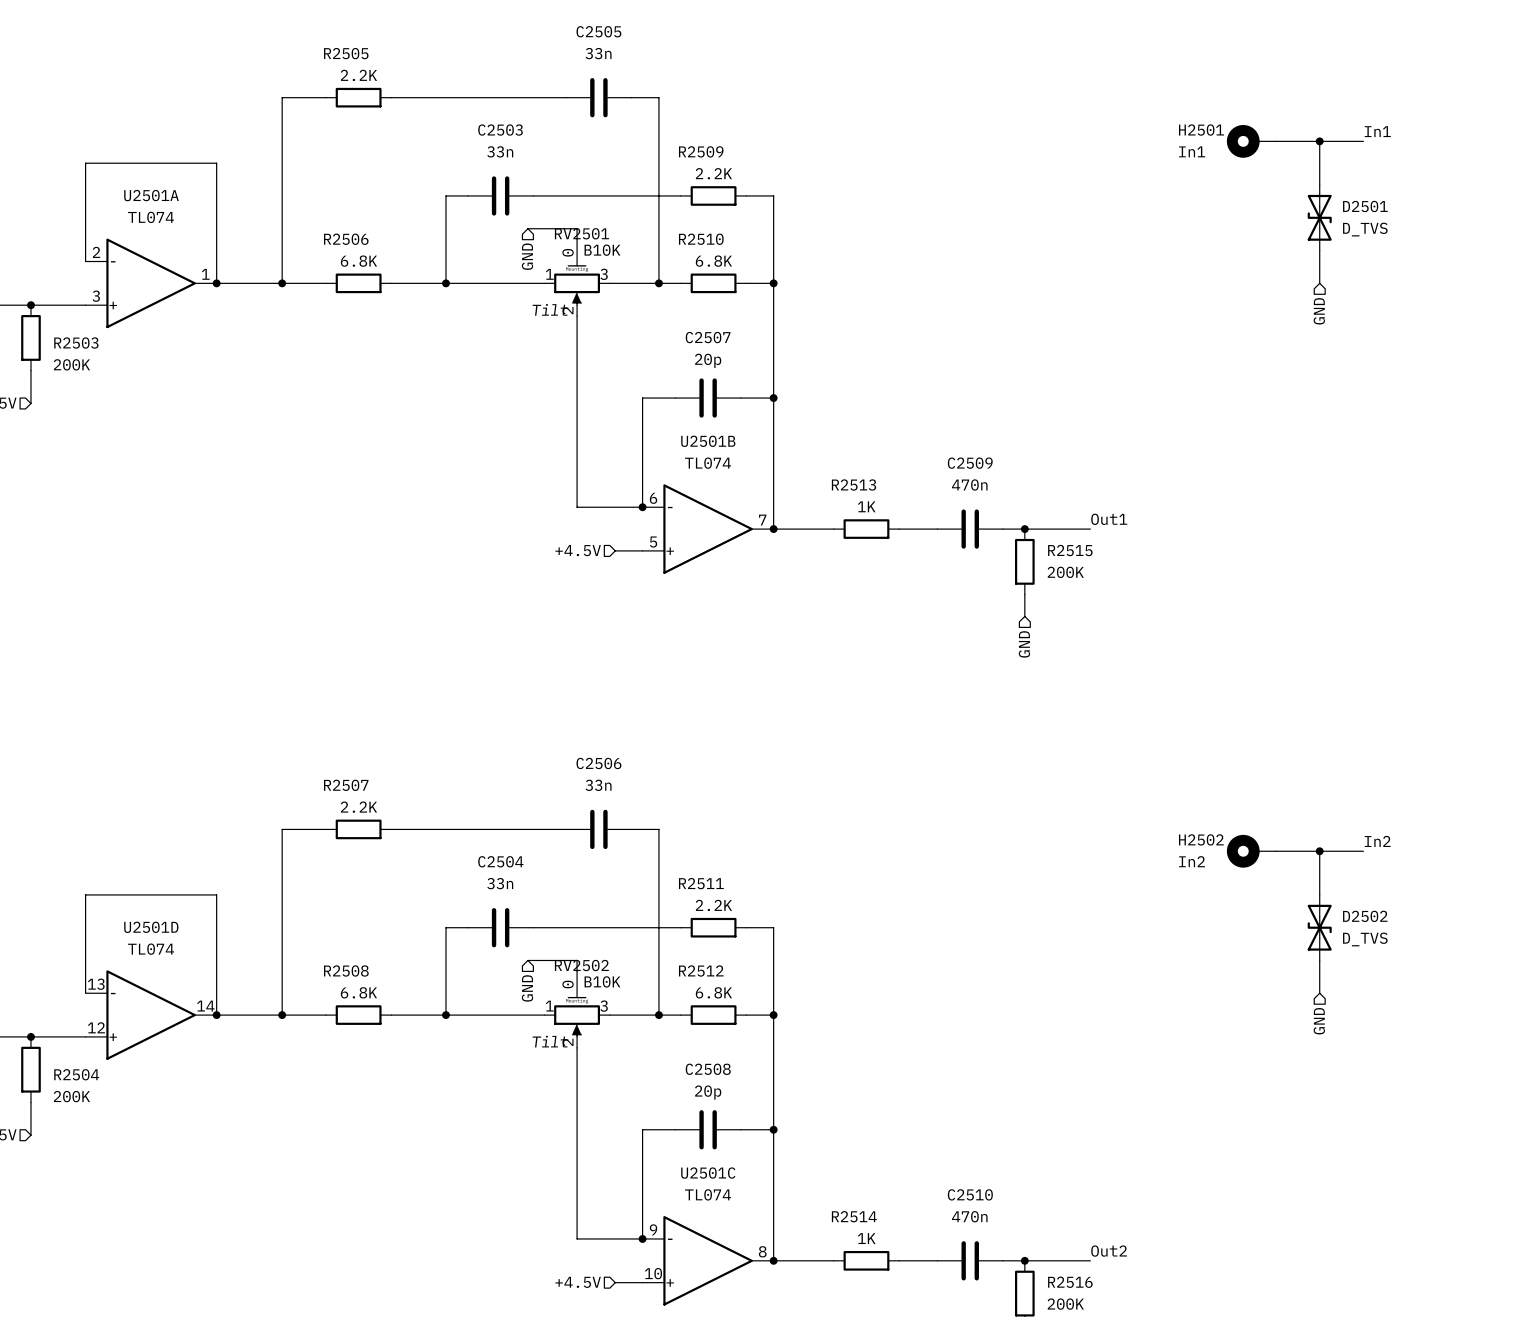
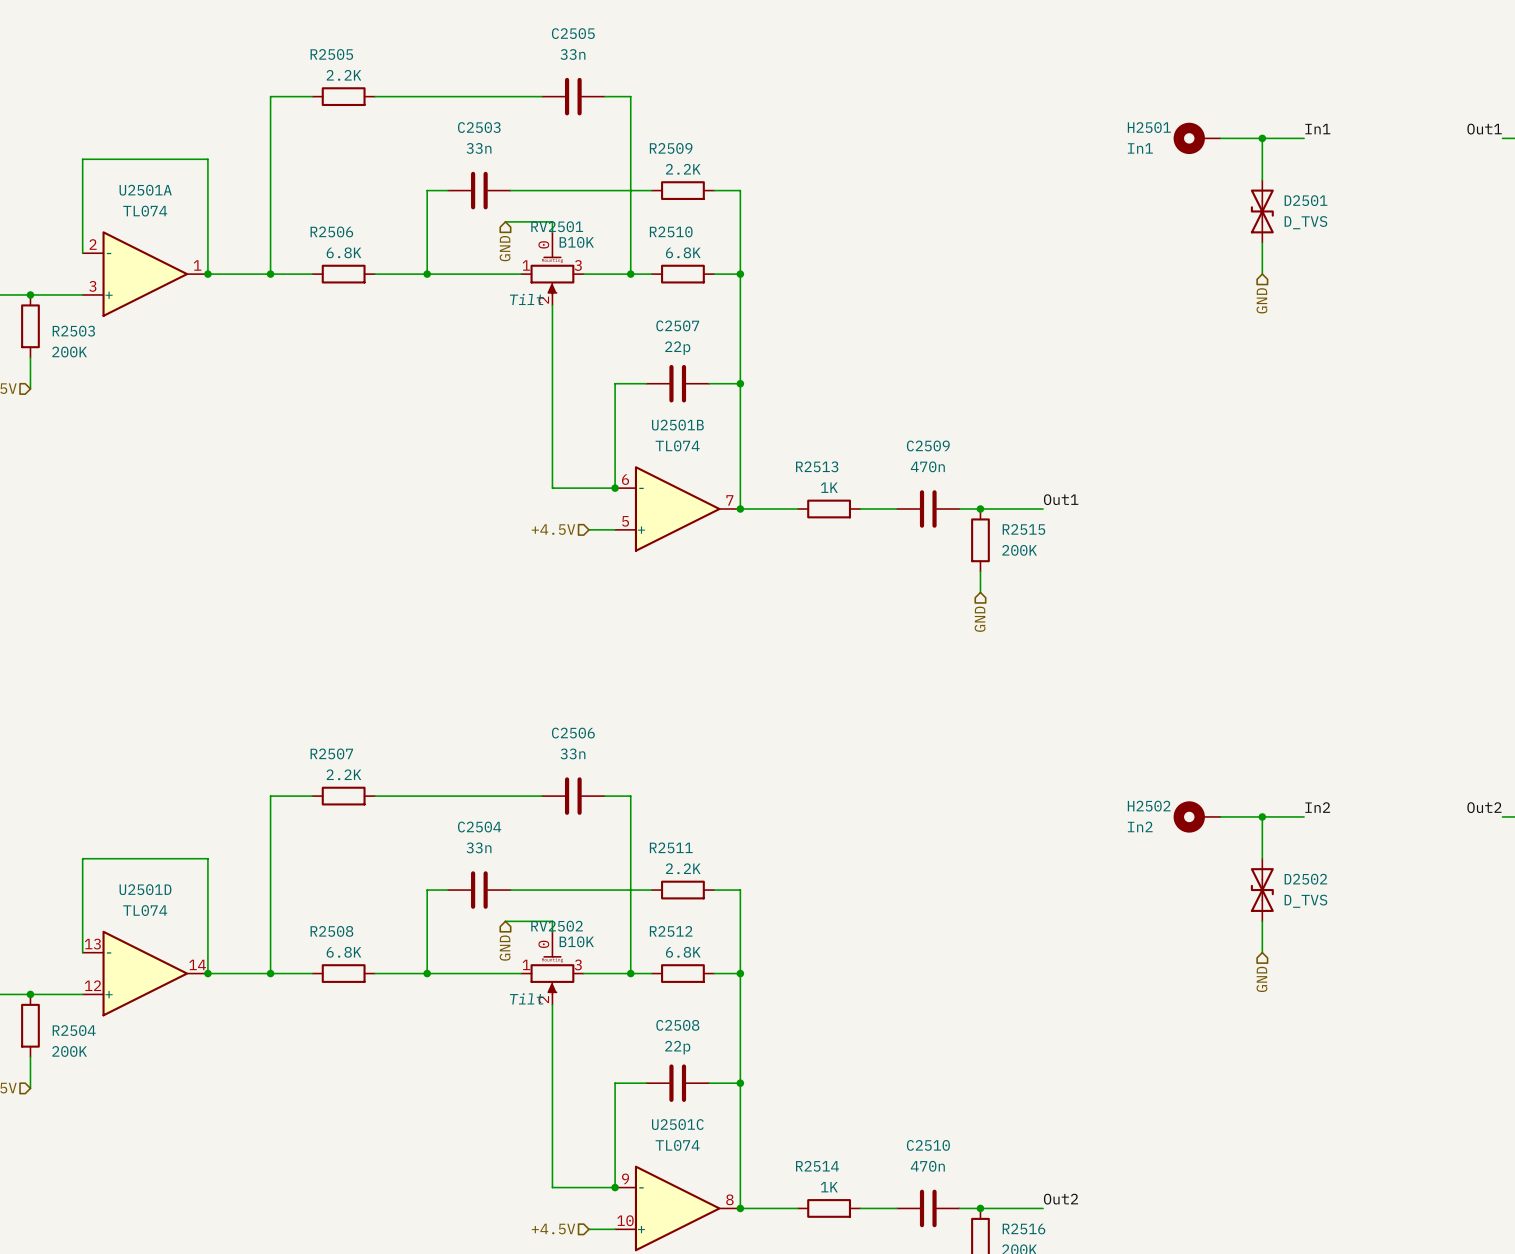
C2507 value: 20p (708, 360) -> 22p (677, 348)
C2508 value: 20p (708, 1092) -> 22p (677, 1047)

